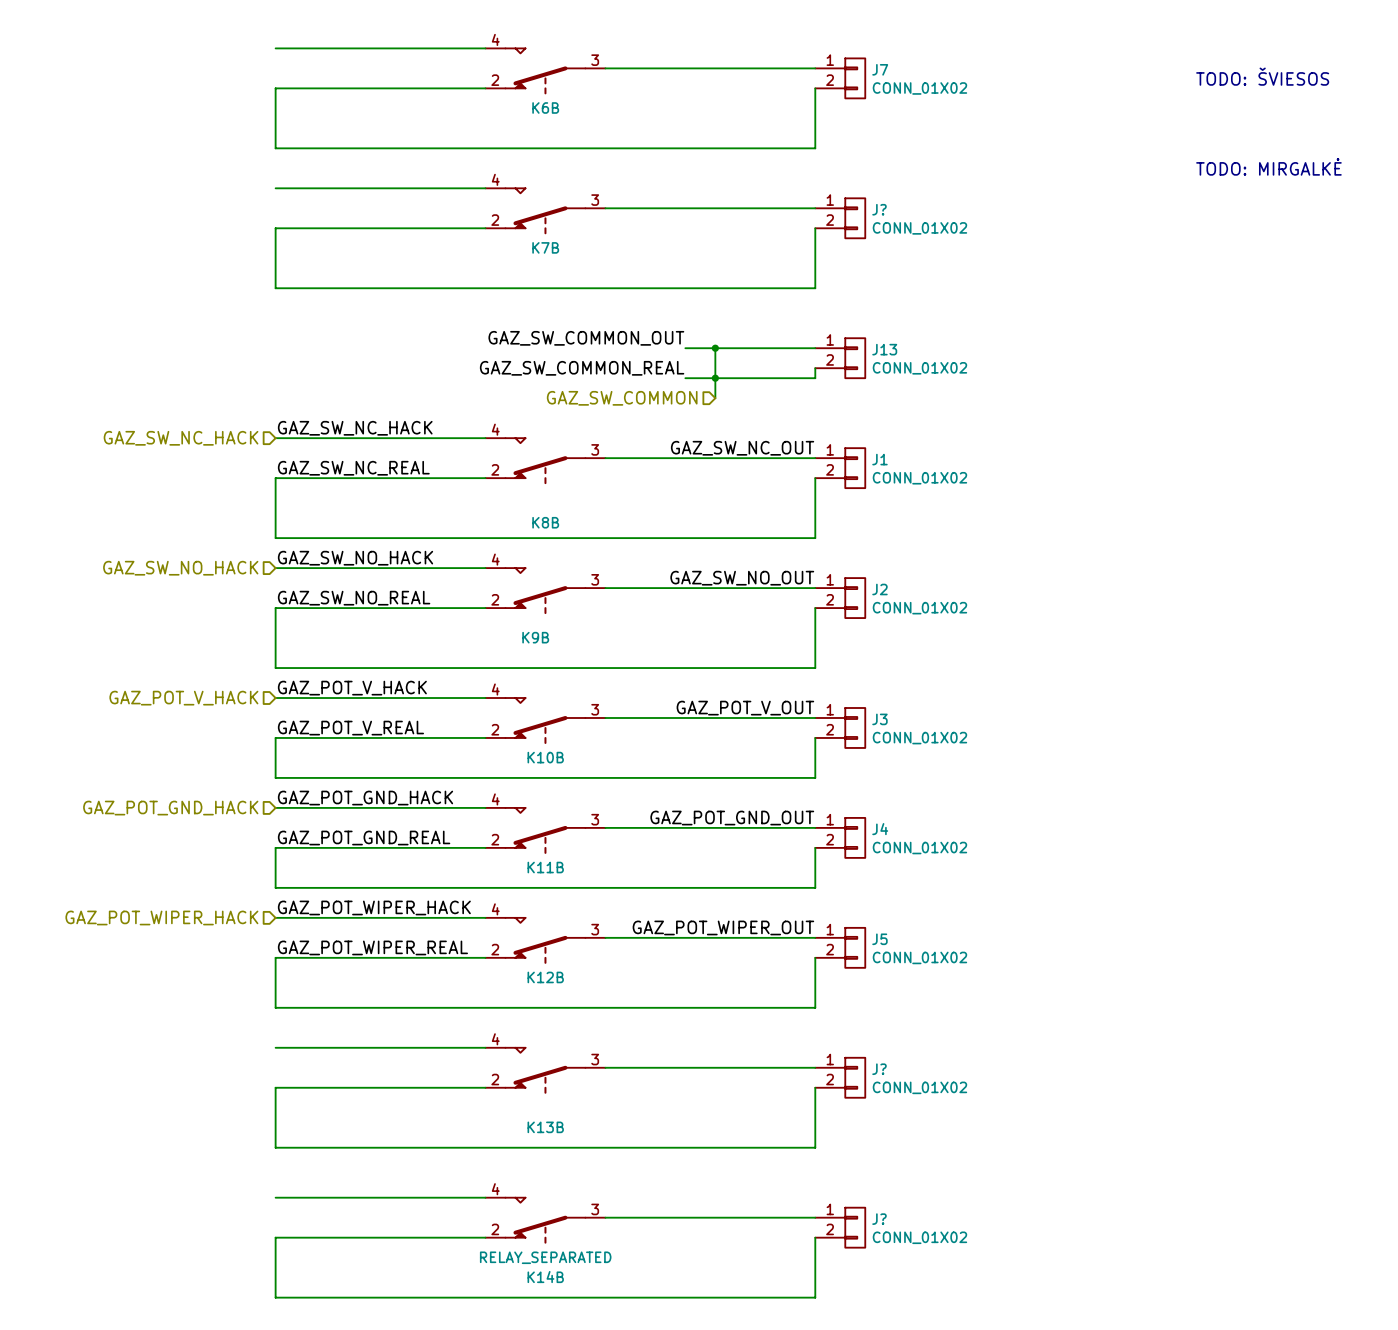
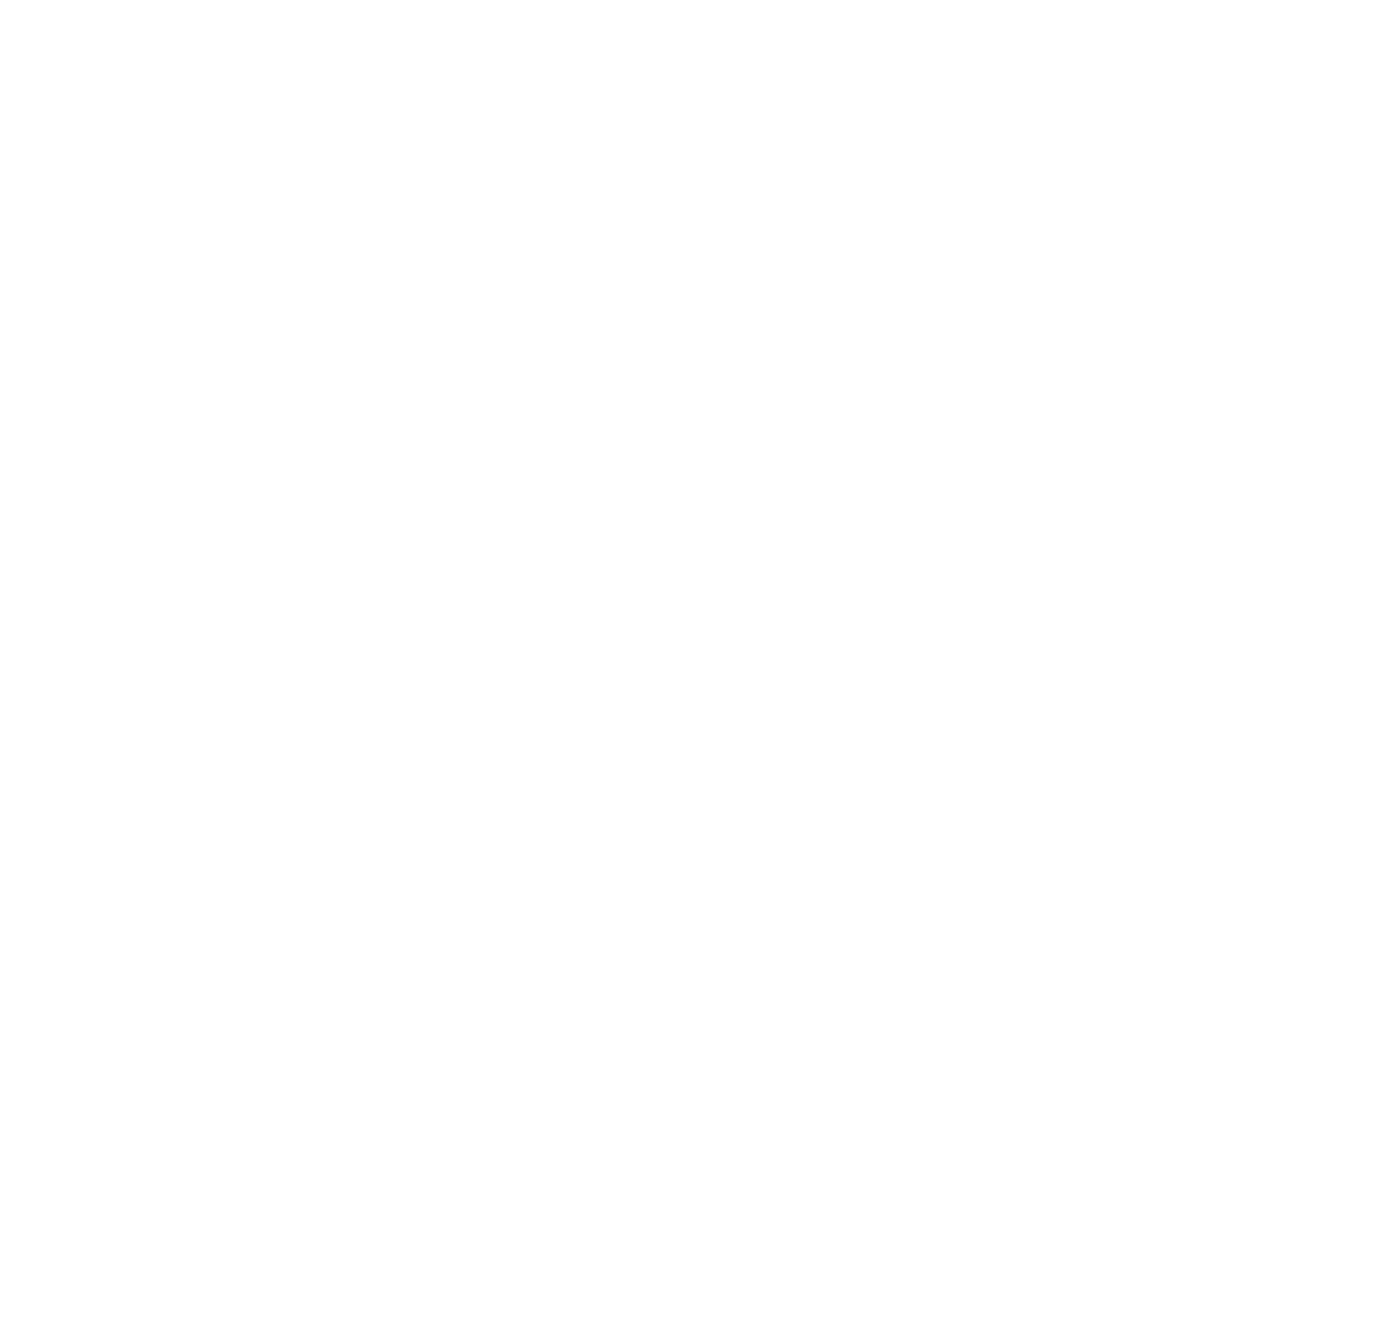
wire: (275, 48) (485, 48) -> none
wire: (605, 68) (815, 68) -> none
K6B: (545, 71) -> none
text: TODO: ŠVIESOS (1262, 76) -> none
J7: CONN_01X02 (840, 78) -> none
wire: (485, 88) (275, 88) (275, 148) (815, 148) (815, 88) -> none
text: TODO: MIRGALKĖ (1268, 166) -> none
wire: (275, 188) (485, 188) -> none
wire: (605, 208) (815, 208) -> none
K7B: (545, 211) -> none
J?: CONN_01X02 (840, 218) -> none
wire: (485, 228) (275, 228) (275, 288) (815, 288) (815, 228) -> none
label: GAZ_SW_COMMON_OUT (586, 338) -> none
wire: (685, 348) (815, 348) -> none
wire: (715, 348) (715, 398) -> none
junction: (715, 348) -> none
J13: CONN_01X02 (840, 358) -> none
label: GAZ_SW_COMMON_REAL (582, 368) -> none
wire: (815, 368) (815, 378) (685, 378) -> none
junction: (715, 378) -> none
hierarchical label: GAZ_SW_COMMON (622, 398) -> none
label: GAZ_SW_NC_HACK (355, 428) -> none
hierarchical label: GAZ_SW_NC_HACK (181, 438) -> none
wire: (275, 438) (485, 438) -> none
label: GAZ_SW_NC_OUT (742, 448) -> none
wire: (605, 458) (815, 458) -> none
K8B: (545, 461) -> none
label: GAZ_SW_NC_REAL (353, 468) -> none
J1: CONN_01X02 (840, 468) -> none
wire: (485, 478) (275, 478) (275, 538) (815, 538) (815, 478) -> none
label: GAZ_SW_NO_HACK (355, 558) -> none
hierarchical label: GAZ_SW_NO_HACK (180, 568) -> none
wire: (275, 568) (485, 568) -> none
label: GAZ_SW_NO_OUT (742, 578) -> none
wire: (605, 588) (815, 588) -> none
K9B: (545, 591) -> none
label: GAZ_SW_NO_REAL (354, 598) -> none
J2: CONN_01X02 (840, 598) -> none
wire: (485, 608) (275, 608) (275, 668) (815, 668) (815, 608) -> none
label: GAZ_POT_V_HACK (352, 688) -> none
hierarchical label: GAZ_POT_V_HACK (183, 698) -> none
wire: (275, 698) (485, 698) -> none
label: GAZ_POT_V_OUT (745, 708) -> none
wire: (605, 717) (815, 717) -> none
K10B: (545, 720) -> none
J3: CONN_01X02 (840, 727) -> none
label: GAZ_POT_V_REAL (350, 728) -> none
wire: (485, 737) (275, 737) (275, 777) (815, 777) (815, 737) -> none
label: GAZ_POT_GND_HACK (365, 798) -> none
wire: (275, 807) (485, 807) -> none
hierarchical label: GAZ_POT_GND_HACK (170, 808) -> none
label: GAZ_POT_GND_OUT (732, 818) -> none
wire: (605, 827) (815, 827) -> none
K11B: (545, 830) -> none
J4: CONN_01X02 (840, 837) -> none
label: GAZ_POT_GND_REAL (364, 838) -> none
wire: (485, 847) (275, 847) (275, 887) (815, 887) (815, 847) -> none
label: GAZ_POT_WIPER_HACK (374, 907) -> none
hierarchical label: GAZ_POT_WIPER_HACK (161, 917) -> none
wire: (275, 917) (485, 917) -> none
label: GAZ_POT_WIPER_OUT (723, 927) -> none
wire: (605, 937) (815, 937) -> none
K12B: (545, 940) -> none
label: GAZ_POT_WIPER_REAL (372, 947) -> none
J5: CONN_01X02 (840, 947) -> none
wire: (485, 957) (275, 957) (275, 1007) (815, 1007) (815, 957) -> none
wire: (275, 1047) (485, 1047) -> none
wire: (605, 1067) (815, 1067) -> none
K13B: (545, 1070) -> none
J?: CONN_01X02 (840, 1077) -> none
wire: (485, 1087) (275, 1087) (275, 1147) (815, 1147) (815, 1087) -> none
wire: (275, 1197) (485, 1197) -> none
wire: (605, 1217) (815, 1217) -> none
K14B: RELAY_SEPARATED (545, 1220) -> none
J?: CONN_01X02 (840, 1227) -> none
wire: (485, 1237) (275, 1237) (275, 1297) (815, 1297) (815, 1237) -> none

